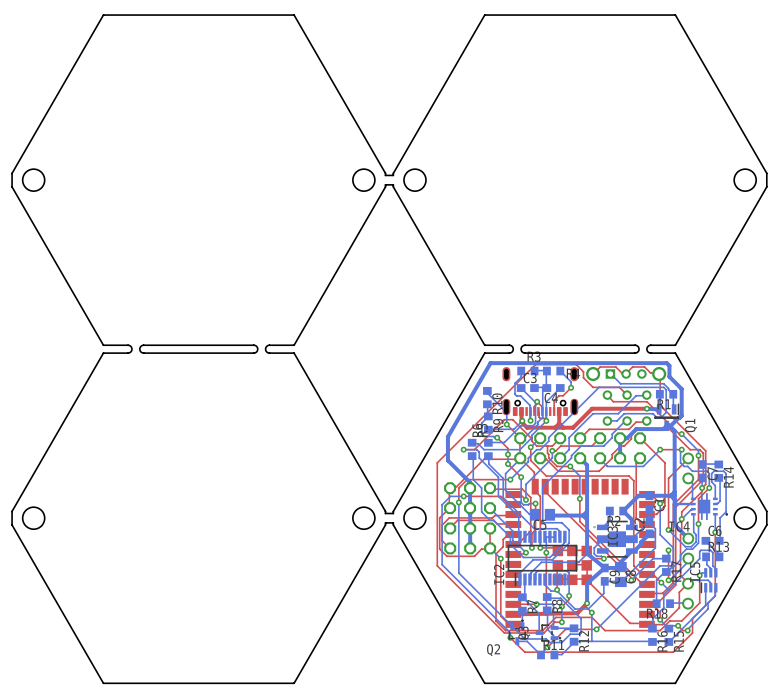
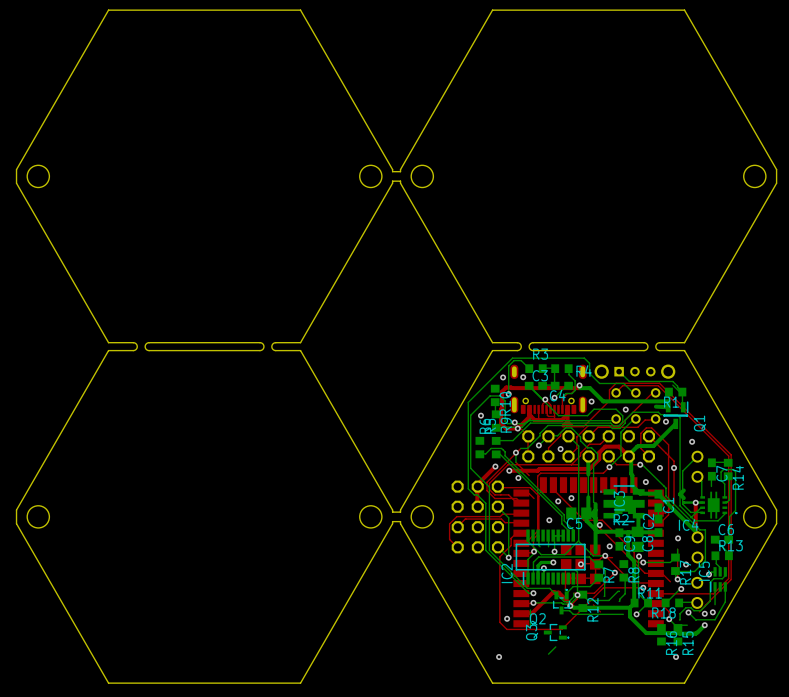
bottom track: (521, 371) (521, 377) (514, 383) (514, 394) (520, 395) (529, 405) (530, 420) -> (529, 368) (521, 360) (514, 360) (508, 365) (508, 394)
bottom track: (560, 371) (571, 381) (571, 387) -> (568, 368) (569, 374) (575, 380) (575, 390) (572, 393) (566, 393) (561, 397)
top track: (593, 374) (600, 366) (615, 366) (621, 372) (626, 374) (632, 366) (644, 366) (650, 372) (658, 372) (660, 405) (705, 450) (705, 484) (702, 488) (702, 491) (681, 511) (680, 575) (688, 583) (679, 592) (679, 607) (662, 624) (630, 623) (586, 579) -> none
via: none -> (503, 377)
via: none -> (523, 377)
bottom track: (546, 387) (542, 387) (542, 417) (524, 437) (520, 438) -> none
bottom track: (663, 387) (599, 387) (548, 437) (548, 441) (540, 449) (536, 449) (528, 458) (528, 461) (510, 479) -> none
bottom track: (560, 388) (546, 401) (546, 420) (539, 427) -> (568, 385) (554, 397)
bottom track: (666, 389) (666, 412) (661, 417) (656, 417) (652, 413) (624, 413) (617, 420) (607, 420) -> (675, 387) (682, 392)
bottom track: (487, 390) (506, 412) (506, 424) -> none
bottom track: none -> (579, 388) (589, 388) (603, 401) (668, 401)
top track: none -> (579, 388) (506, 387) (502, 391) (501, 423) (505, 428) (517, 428) (530, 415)
top track: (607, 395) (613, 401) (646, 401) (679, 434) (681, 434) -> none
bottom track: none -> (635, 392) (633, 392) (623, 383) (599, 383) (589, 373) (589, 363) (584, 358) (512, 358) (468, 402) (468, 488) (485, 503) (485, 550) (528, 593) (533, 593)
top track: (627, 395) (619, 387) (593, 387) (583, 377) (583, 371) (576, 364) (535, 364) (437, 462) (437, 565) (504, 632) (543, 632) (554, 622) (561, 622) -> none
bottom track: (646, 395) (636, 395) (618, 413) (593, 413) (569, 437) (569, 449) (560, 458) -> none
top track: none -> (655, 392) (652, 392) (619, 425) (588, 425) (576, 436) (576, 448) (568, 456)
via: none -> (508, 394)
via: none -> (554, 397)
bottom track: (535, 401) (535, 423) (533, 425) (521, 425) (504, 442) -> (529, 385) (558, 415) (587, 415) (593, 409) (616, 409) (622, 415) (622, 421) (618, 426) (613, 426) (610, 423) (530, 423) (512, 440)
via: none -> (591, 401)
top track: (646, 408) (592, 408) (573, 427) (527, 427) (521, 422) (521, 411) -> (567, 409) (567, 414) (561, 420) (534, 420) (529, 414) (529, 409)
via: (646, 408) -> none
via: none -> (625, 409)
bottom track: (488, 416) (481, 423) (481, 434) (484, 436) (497, 437) -> none
via: none -> (480, 415)
via: (522, 420) -> none
via: (530, 420) -> none
via: (546, 420) -> none
via: none -> (665, 421)
bottom track: (669, 425) (674, 430) (674, 524) (688, 538) -> (675, 423) (653, 446) (637, 446) (629, 454) (632, 485) (640, 493) (658, 493) (697, 533) (697, 537)
via: none -> (517, 428)
bottom track: (681, 434) (698, 450) (698, 455) -> none
via: (681, 434) -> none
top track: (497, 437) (508, 448) (508, 454) -> none
via: (497, 437) -> none
bottom track: (612, 437) (603, 446) (581, 446) (542, 486) (542, 521) (561, 522) (569, 529) (569, 543) -> (568, 436) (578, 446) (577, 541)
bottom track: none -> (620, 435) (620, 455) (609, 467)
top track: (560, 438) (552, 446) (536, 446) (512, 419) (504, 419) (474, 449) (463, 449) -> none
bottom track: (472, 442) (478, 443) (484, 449) (519, 449) -> (520, 448) (528, 447)
via: none -> (692, 441)
top track: (547, 446) (548, 458) (557, 466) -> (494, 494) (489, 489) (489, 483) (508, 464) (565, 464)
top track: (581, 446) (560, 446) (555, 450) (552, 450) -> (589, 444) (571, 464)
top track: (530, 447) (530, 460) (546, 476) (629, 476) (633, 480) (633, 565) (642, 574) -> (599, 525) (599, 528) (645, 573) (651, 573)
bottom track: (463, 449) (476, 449) (479, 452) (479, 458) (498, 477) (498, 496) (518, 516) (519, 536) -> (564, 554) (541, 554) (528, 541) (528, 535)
via: (463, 449) -> none
bottom track: (660, 449) (643, 466) (633, 466) -> none
via: (660, 449) -> none
bottom track: (681, 449) (680, 462) (692, 471) (706, 471) (709, 473) (709, 488) -> none
top track: (681, 449) (660, 449) -> none
via: (681, 449) -> none
top track: none -> (520, 448) (487, 482) (487, 490) (494, 498) (516, 498) (521, 503)
bottom track: (552, 450) (552, 458) (525, 484) (525, 499) -> none
top track: (698, 455) (698, 479) (673, 504) (673, 582) (662, 593) (646, 594) -> (616, 392) (622, 385) (658, 385) (728, 456) (728, 578) (713, 593) (655, 593)
via: (698, 455) -> none
bottom track: (472, 456) (473, 479) (481, 488) -> (616, 419) (614, 420) (528, 420) (524, 423) (507, 423) (505, 421) (505, 400) (500, 395) (490, 395) (470, 415) (470, 468) (489, 487)
bottom track: (488, 456) (488, 464) (503, 478) (503, 497) (534, 528) (557, 528) -> (496, 454) (500, 454) (561, 516) (561, 523) (565, 527)
bottom track: (520, 458) (505, 473) (505, 490) (529, 514) (534, 514) -> none
top track: (540, 458) (546, 459) (558, 471) (599, 471) (612, 458) (612, 454) (631, 438) (631, 435) (637, 429) (669, 429) (690, 449) (699, 449) (703, 453) (703, 479) (675, 507) (675, 585) (654, 606) (646, 604) -> (548, 456) (548, 447) (560, 435) (560, 432) (566, 426) (583, 426) (609, 400) (609, 389) (616, 383) (659, 383) (731, 454) (731, 579) (705, 605)
bottom track: (580, 458) (587, 465) (587, 505) -> (548, 436) (557, 435) (565, 427) (571, 427) (587, 447) (591, 447) (597, 453) (597, 459) (593, 463) (593, 502) (595, 504)
bottom track: (600, 458) (607, 466) (631, 466) -> none
top track: none -> (608, 456) (616, 464) (640, 464)
bottom track: (620, 458) (620, 438) (627, 438) (636, 429) (663, 429) (666, 425) (670, 425) (681, 415) (681, 388) (669, 376) (669, 365) (666, 363) (490, 363) (447, 436) (447, 460) (470, 482) (470, 548) -> none
top track: none -> (628, 456) (619, 446) (605, 446) (599, 452) (599, 459) (589, 468) (509, 470)
top track: (640, 458) (636, 462) (636, 517) (642, 523) (646, 523) -> (648, 456) (640, 448) (640, 433) (646, 427) (651, 427) (668, 444) (668, 514) (660, 522) (655, 522)
bottom track: none -> (697, 456) (682, 471) (682, 504) (690, 512) (702, 512)
top track: (688, 458) (668, 478) (668, 529) -> none
via: (508, 464) -> none
bottom track: (570, 466) (579, 476) -> (588, 456) (588, 474)
via: (570, 466) -> none
via: none -> (640, 464)
top track: none -> (495, 466) (478, 483) (477, 506)
via: none -> (495, 466)
top track: none -> (609, 467) (603, 473) (540, 473) (537, 476) (537, 534) (533, 538) (533, 554)
via: none -> (609, 467)
via: none -> (659, 467)
via: none -> (674, 467)
via: none -> (509, 470)
bottom track: (521, 477) (521, 502) (523, 504) (535, 503) -> none
via: (521, 477) -> none
top track: (510, 479) (467, 479) (458, 488) (458, 502) -> none
via: none -> (645, 482)
top track: (545, 486) (546, 492) (631, 577) (631, 580) -> (553, 485) (553, 490) (584, 520) (602, 520) (634, 552) (634, 558) (637, 562) (643, 562)
via: (702, 488) -> none
top track: (709, 488) (698, 498) (698, 523) -> none
via: (709, 488) -> none
bottom track: (674, 495) (638, 495) (623, 511) (631, 519) (631, 527) -> none
bottom track: (463, 496) (450, 496) (442, 504) (442, 564) (510, 632) (510, 637) -> none
via: (463, 496) -> none
top track: (487, 496) (463, 496) -> none
bottom track: none -> (588, 497) (586, 520) (597, 531) (637, 531)
top track: (579, 498) (579, 521) (642, 583) -> (605, 555) (632, 582) (651, 582)
via: (579, 498) -> none
via: (525, 499) -> none
via: none -> (571, 498)
bottom track: (458, 502) (458, 573) (524, 638) (546, 638) (549, 642) (561, 642) (570, 634) (579, 634) (581, 618) (560, 598) (547, 597) -> none
via: (458, 502) -> none
via: none -> (558, 501)
top track: (535, 503) (535, 529) (531, 533) (531, 547) -> none
via: (535, 503) -> none
bottom track: (660, 503) (660, 534) (673, 547) (673, 563) (670, 565) (660, 565) (596, 629) -> none
via: (660, 503) -> none
top track: none -> (695, 502) (695, 535) (697, 537)
via: none -> (695, 502)
bottom track: (481, 511) (490, 520) (493, 520) (510, 537) (510, 544) (523, 557) (549, 557) (564, 543) (564, 536) -> (479, 454) (485, 453) (491, 448) (501, 448) (505, 451) (505, 455) (564, 515) (564, 520) (573, 529) (573, 535)
bottom track: none -> (489, 510) (489, 550) (527, 588) (549, 588) (564, 601) (569, 601) (573, 596) (573, 593)
bottom track: (609, 511) (609, 520) (602, 527) -> none
C5 position: (542, 514) -> (578, 513)
bottom track: (549, 514) (587, 515) -> none
bottom track: (693, 514) (693, 532) (696, 534) -> (642, 464) (665, 488) (665, 496) (699, 529) (705, 529) (705, 533)
bottom track: (715, 515) (715, 532) -> (724, 514) (718, 520) (694, 520) (680, 505) (680, 417) (677, 414) (633, 412) (619, 428) (612, 428) (609, 425) (547, 425)
bottom track: none -> (638, 515) (637, 531)
bottom track: (500, 519) (512, 531) (512, 540) (525, 552) -> (508, 517) (508, 555)
via: (681, 519) -> none
via: none -> (549, 520)
bottom track: (698, 523) (698, 543) (692, 549) (686, 549) (680, 555) (680, 559) (656, 580) (656, 603) -> (681, 589) (665, 602)
via: (698, 523) -> none
via: none -> (599, 525)
top track: (490, 528) (490, 549) (481, 549) (474, 556) (446, 556) (439, 549) (439, 517) (450, 508) (450, 488) (455, 488) (484, 459) (520, 458) (534, 472) (535, 491) (540, 496) (540, 547) (554, 547) (557, 550) (585, 550) (594, 558) -> none
bottom track: (668, 529) (685, 546) (691, 546) (696, 541) -> (675, 579) (675, 571) (694, 571) (705, 560) (705, 540)
via: (668, 529) -> none
top track: (715, 532) (715, 595) (692, 618) (692, 632) (673, 652) (524, 652) (510, 637) -> none
via: (715, 532) -> none
bottom track: none -> (628, 532) (628, 555) (634, 561) (634, 603) (629, 607)
bottom track: (649, 533) (634, 550) (631, 550) (620, 562) (619, 567) (604, 567) -> (658, 532) (637, 531)
bottom track: (602, 539) (594, 547) (594, 553) (603, 558) -> none
IC3 position: (615, 539) -> (622, 503)
bottom track: (631, 539) (649, 520) (655, 528) (655, 547) (621, 581) (603, 581) (603, 593) (588, 609) (575, 609) (557, 591) (551, 591) (545, 585) (544, 579) -> none
via: none -> (678, 538)
bottom track: none -> (578, 541) (593, 555) (605, 555)
via: (531, 547) -> none
via: (540, 547) -> none
via: none -> (609, 546)
via: (668, 550) -> none
top track: (546, 552) (546, 613) -> none
top track: (496, 553) (496, 621) (505, 630) (542, 630) (555, 617) (591, 617) (605, 630) (660, 630) (669, 621) (681, 621) (690, 612) -> (503, 552) (499, 556) (499, 622) (506, 629) (561, 629) (603, 587) (643, 587)
bottom track: (556, 555) (552, 559) (533, 559) (519, 573) -> (533, 554) (528, 559) (528, 572)
via: none -> (605, 555)
bottom track: none -> (639, 556) (638, 593) (648, 603) (636, 614)
via: none -> (639, 556)
top track: (500, 558) (500, 616) (508, 623) (513, 624) -> none
via: (603, 558) -> none
bottom track: (666, 558) (652, 558) (631, 580) -> (675, 557) (670, 562) (643, 562)
bottom track: (688, 558) (687, 562) (668, 580) -> none
via: none -> (553, 562)
via: none -> (643, 562)
via: none -> (580, 564)
via: none -> (686, 564)
bottom track: (604, 567) (587, 553) (578, 562) (541, 562) (530, 573) (529, 579) -> (553, 562) (541, 562) (538, 565) (538, 578)
bottom track: (604, 567) (587, 583) (587, 603) -> none
via: none -> (543, 568)
bottom track: (715, 572) (712, 565) (712, 552) (710, 550) (700, 550) (699, 558) (663, 594) (663, 607) (652, 618) (652, 628) -> (725, 571) (725, 575) (722, 578) (713, 578) (710, 582) (710, 601) (700, 610) (686, 607) (680, 613) (679, 619)
top track: none -> (614, 572) (594, 593) (573, 593)
via: none -> (614, 572)
C9 position: (604, 574) -> (619, 539)
C8 position: (620, 574) -> (637, 539)
top track: (699, 575) (699, 603) (696, 606) -> none
bottom track: none -> (598, 577) (590, 586) (573, 586) (566, 595)
bottom track: none -> (623, 577) (625, 593) (619, 601)
bottom track: (524, 579) (524, 595) (522, 597) (539, 613) (539, 633) -> (533, 578) (533, 562) (538, 557) (589, 557) (605, 570) (604, 596)
via: (631, 580) -> none
bottom track: (661, 582) (668, 589) -> none
via: (661, 582) -> none
bottom track: (688, 583) (691, 580) (708, 580) (710, 587) -> none
bottom track: (715, 587) (715, 595) (708, 603) (708, 609) (687, 630) -> (725, 586) (725, 601) (715, 619) (696, 619) (688, 612)
via: none -> (643, 587)
via: (557, 589) -> none
via: none -> (681, 589)
bottom track: none -> (619, 591) (608, 600) (588, 600) (582, 594) (579, 595) (570, 604) (533, 602)
via: none -> (533, 593)
R7 position: (522, 603) -> (598, 571)
via: none -> (533, 602)
R8 position: (547, 603) -> (623, 570)
top track: (587, 603) (577, 613) (513, 614) -> (573, 607) (558, 592) (553, 592) (532, 613) (521, 613)
via: (587, 603) -> none
bottom track: (536, 604) (553, 605) (554, 628) (574, 628) -> none
via: (536, 604) -> none
bottom track: (705, 605) (668, 641) (575, 641) (561, 654) (554, 654) -> none
bottom track: (561, 606) (561, 622) -> none
bottom track: none -> (629, 607) (573, 607)
bottom track: none -> (629, 607) (629, 616) (646, 633) (695, 633) (704, 625)
bottom track: (547, 610) (547, 629) (554, 638) -> none
bottom track: none -> (561, 610) (569, 610) (573, 614) (623, 614)
bottom track: (591, 612) (591, 641) -> none
via: (591, 612) -> none
via: none -> (688, 612)
via: none -> (712, 612)
via: none -> (704, 613)
via: none -> (636, 614)
via: none -> (507, 618)
via: (561, 622) -> none
top track: (678, 625) (682, 630) (687, 630) -> none
via: (678, 625) -> none
via: none -> (704, 625)
top track: (596, 629) (565, 629) (547, 647) -> none
via: (596, 629) -> none
via: (687, 630) -> none
Q2 position: (517, 632) -> (561, 601)
R12 position: (574, 635) -> (582, 601)
via: (510, 637) -> none
bottom track: (517, 641) (527, 641) (541, 654) -> none
via: (547, 647) -> none
R11 position: (547, 654) -> (641, 603)
via: none -> (499, 656)
via: none -> (676, 656)

